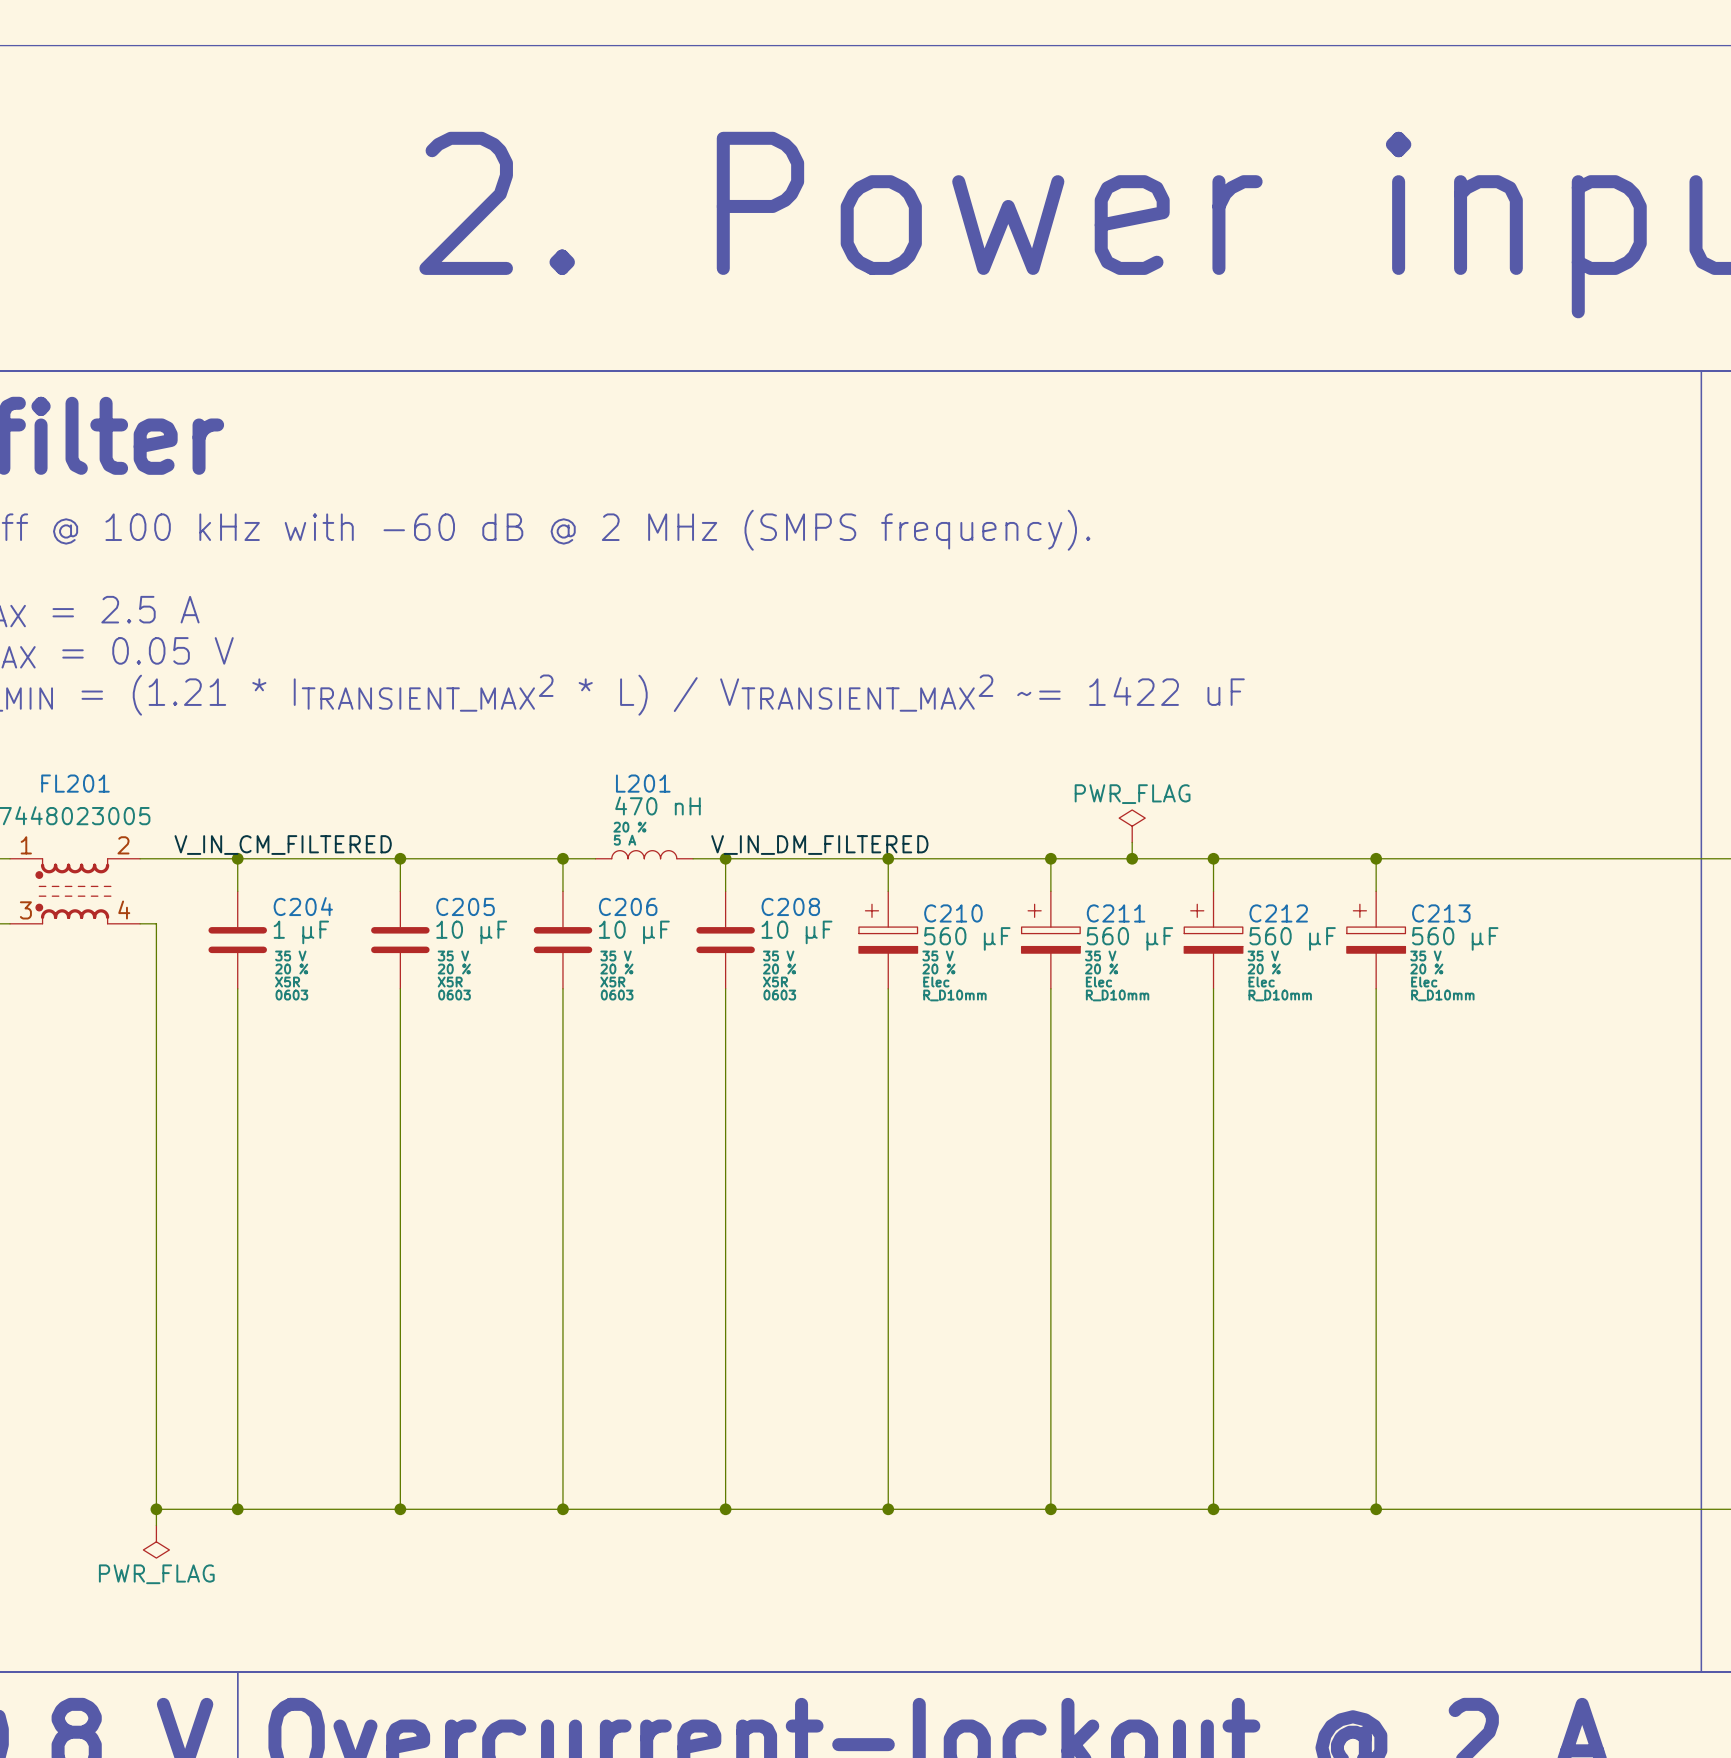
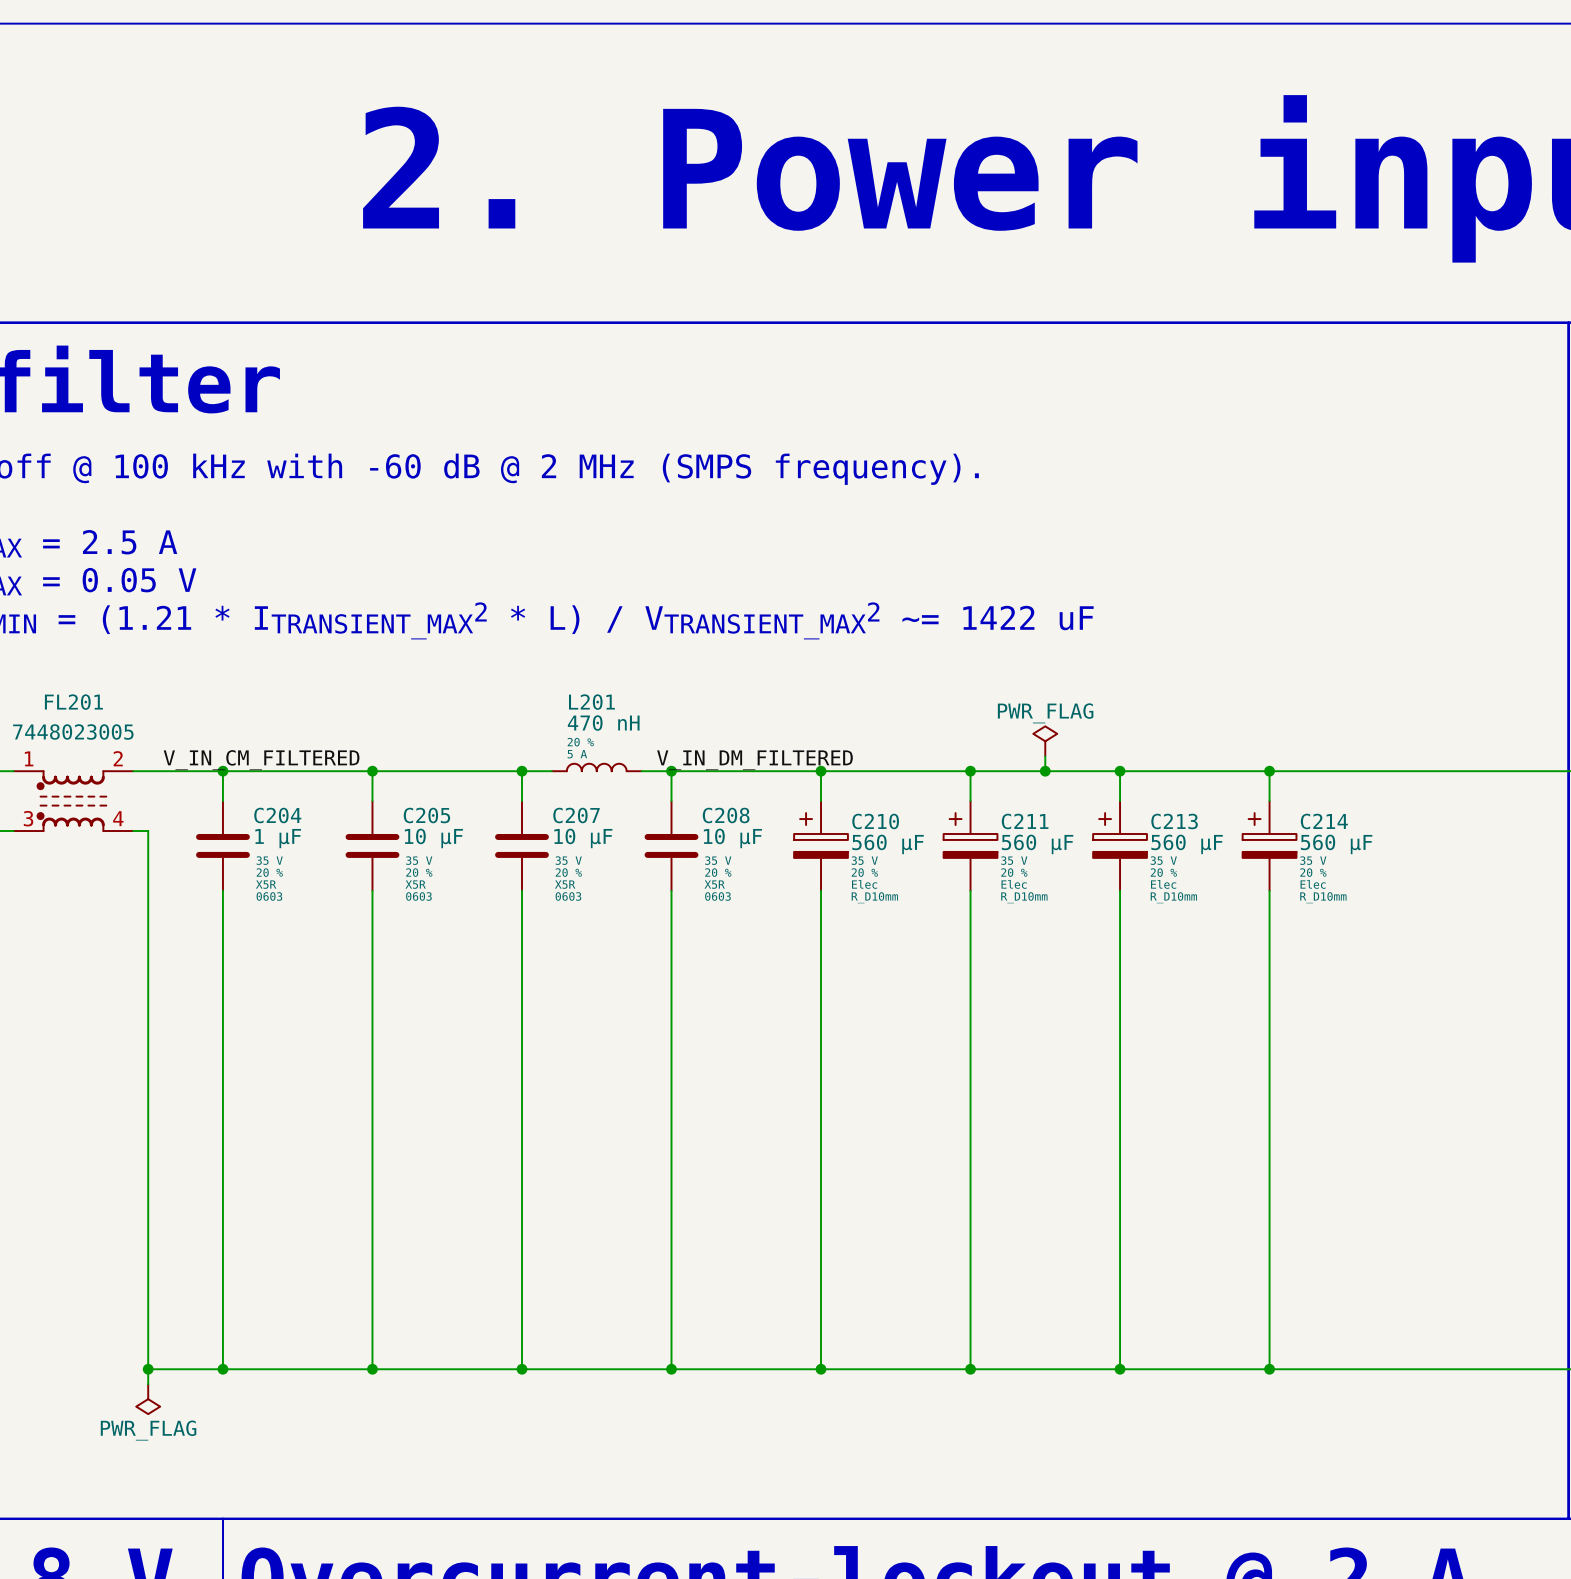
C206 name: C206 (628, 906) -> C207 (576, 815)
C212 name: C212 (1278, 913) -> C213 (1174, 821)
C213 name: C213 (1441, 913) -> C214 (1324, 821)

